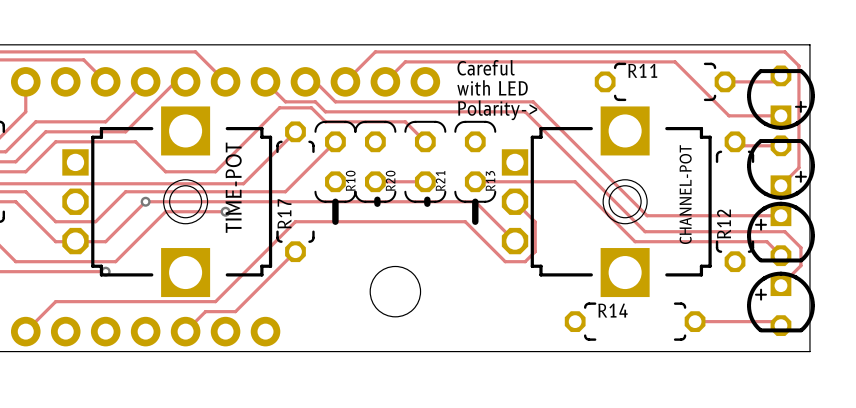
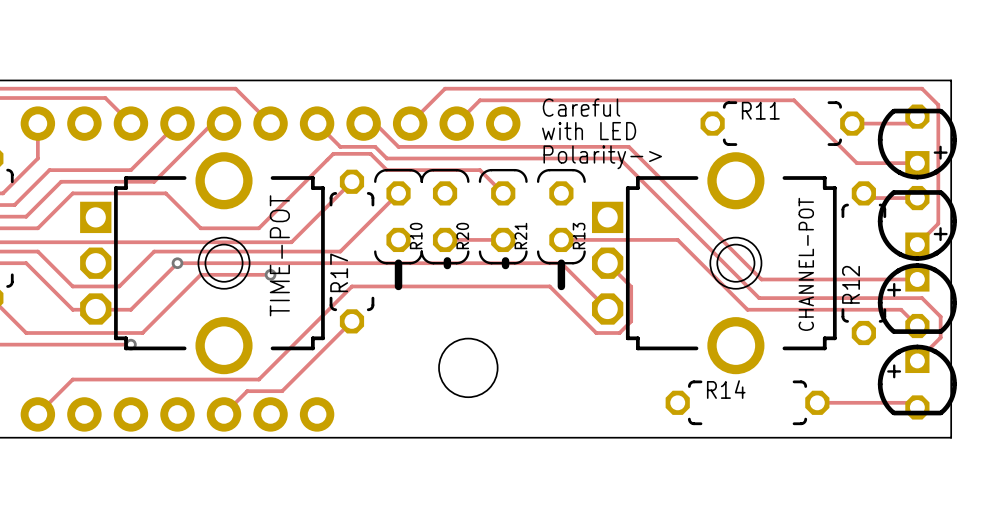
TIME-POT footprint: [62, 106, 273, 298] -> [80, 152, 325, 375]
CHANNEL-POT footprint: [501, 106, 712, 298] -> [591, 152, 837, 375]

